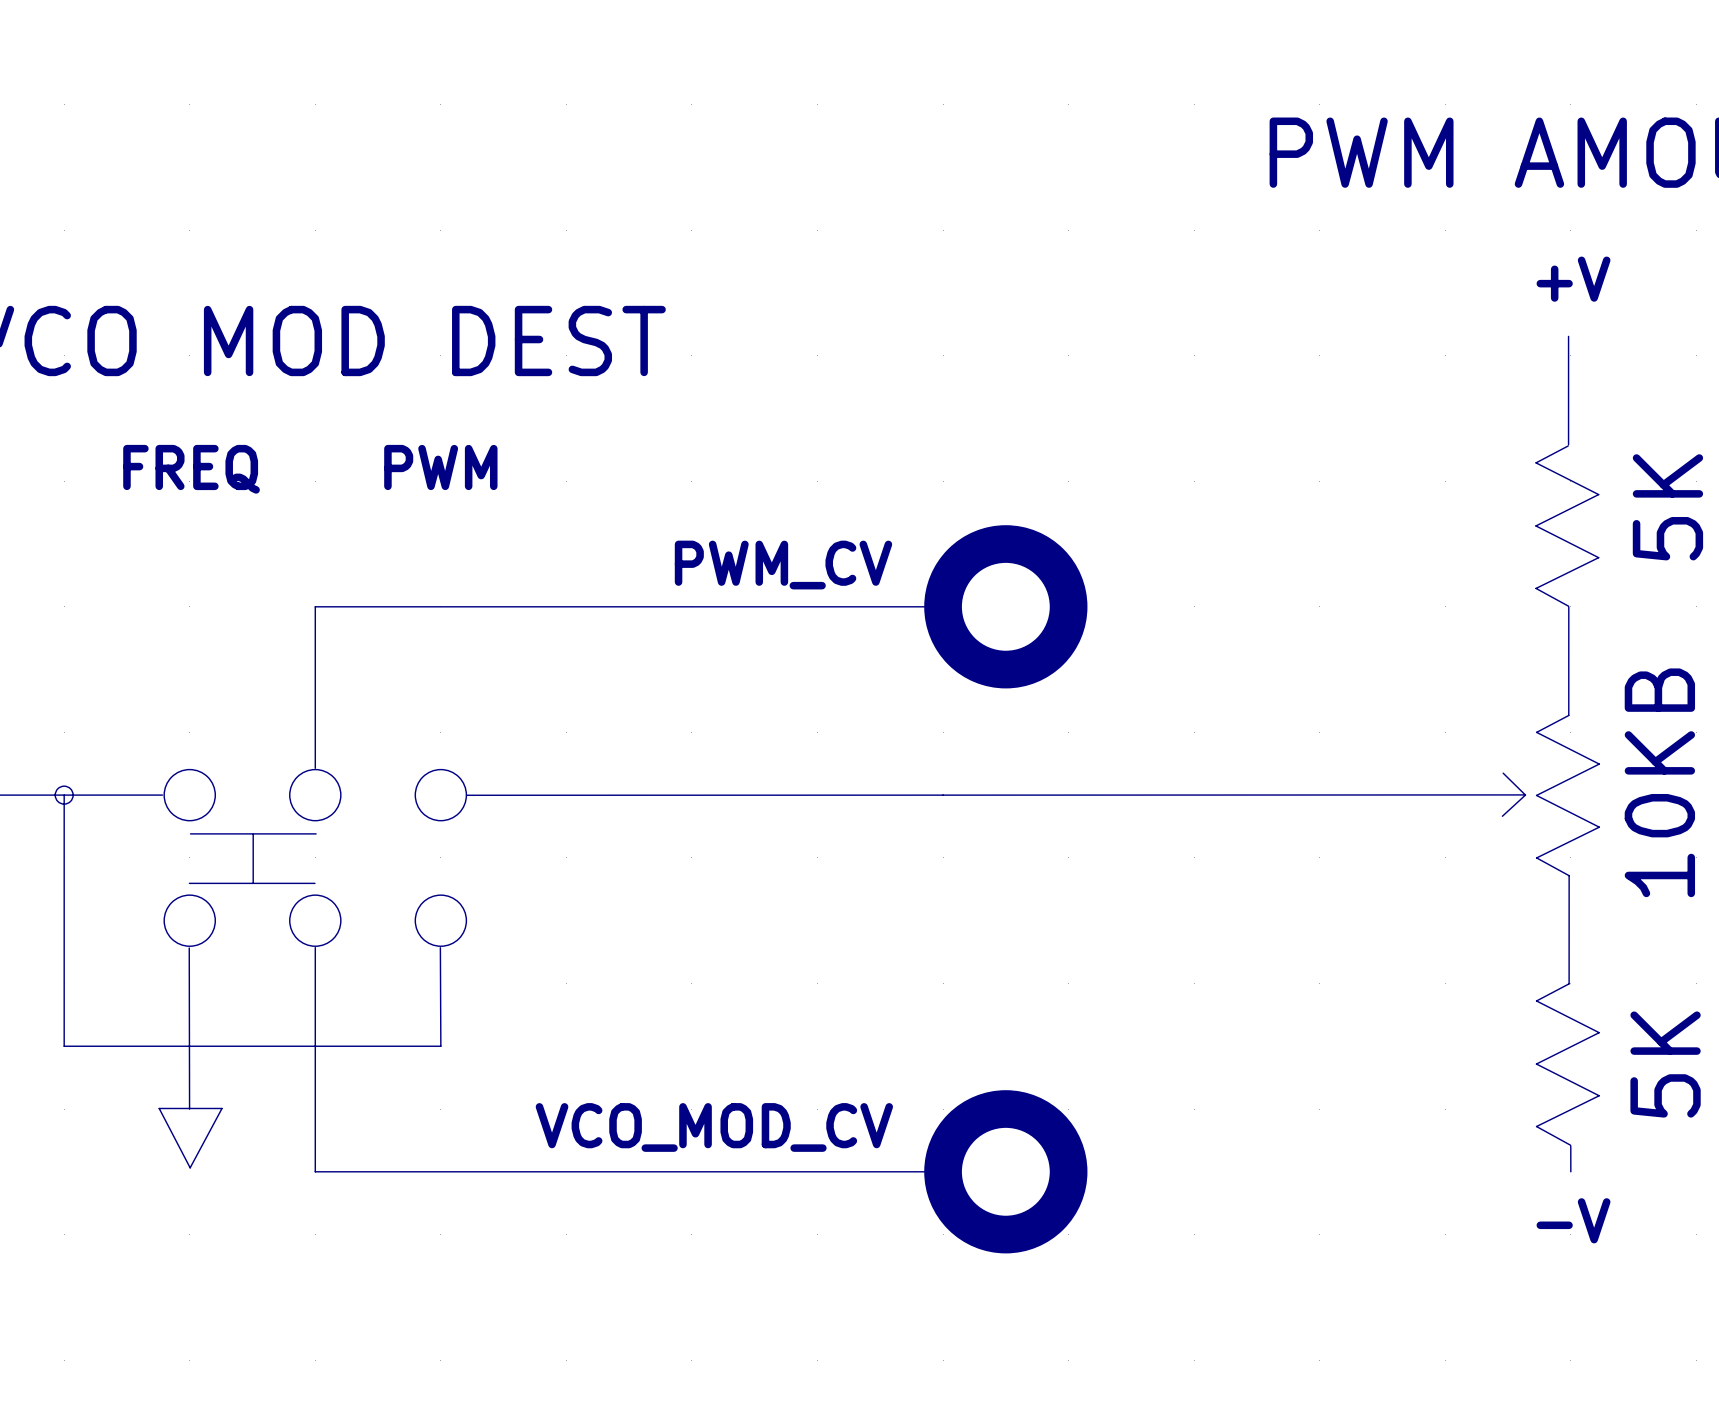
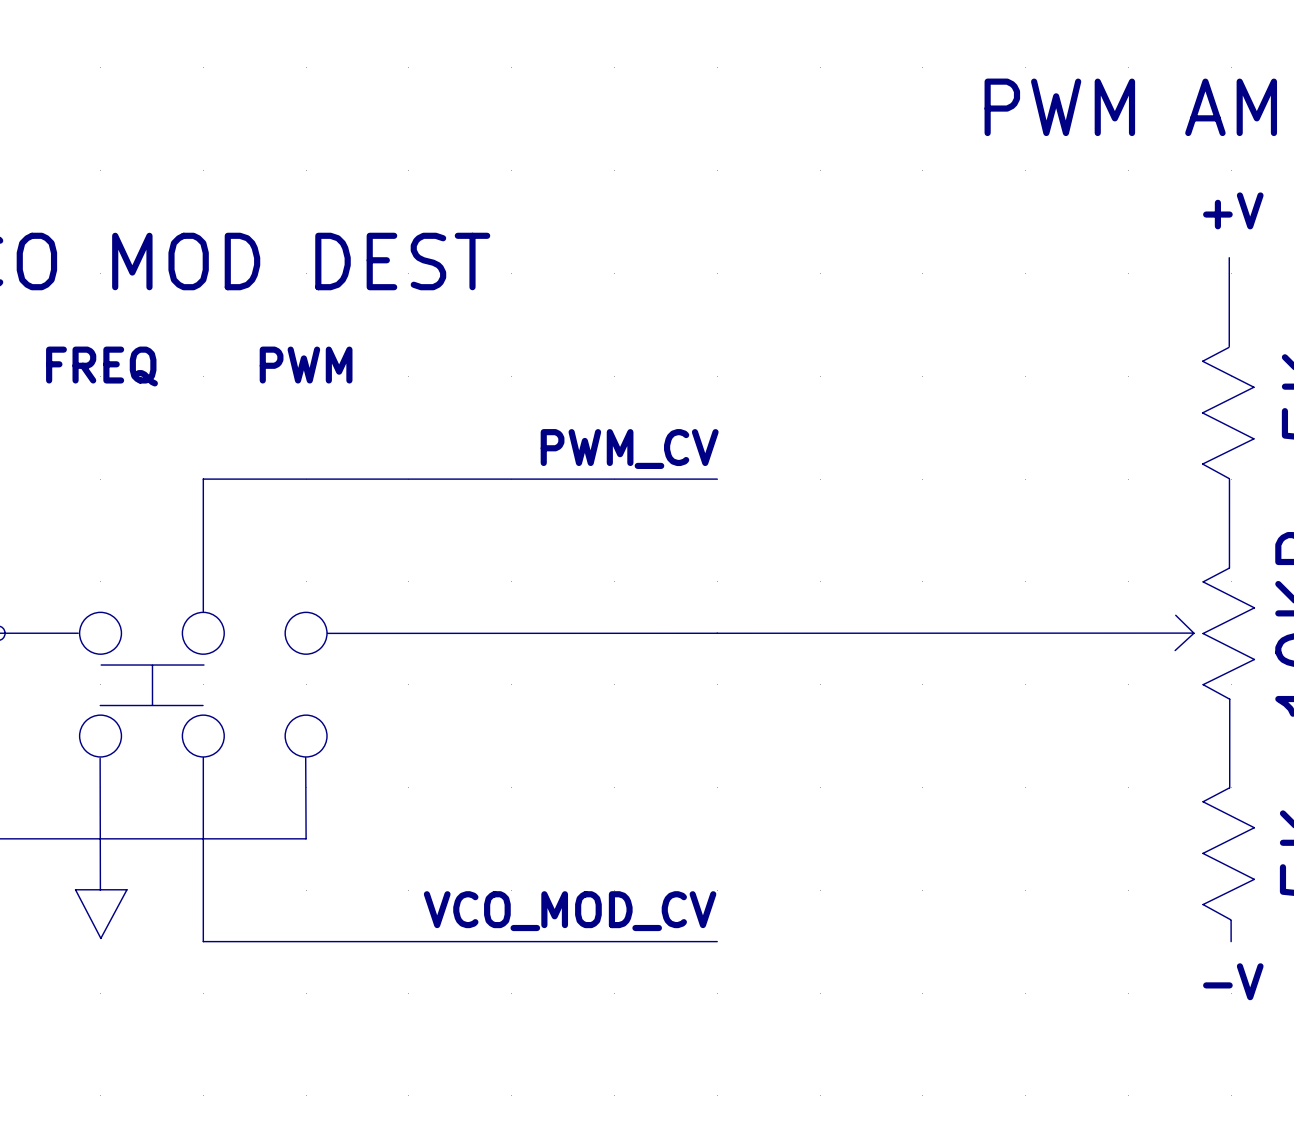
drawing: [924, 525, 1088, 689] -> none
text position: PWM_CV (783, 565) -> PWM_CV (629, 449)
drawing: [924, 1090, 1088, 1254] -> none
text position: VCO_MOD_CV (714, 1127) -> VCO_MOD_CV (570, 911)

